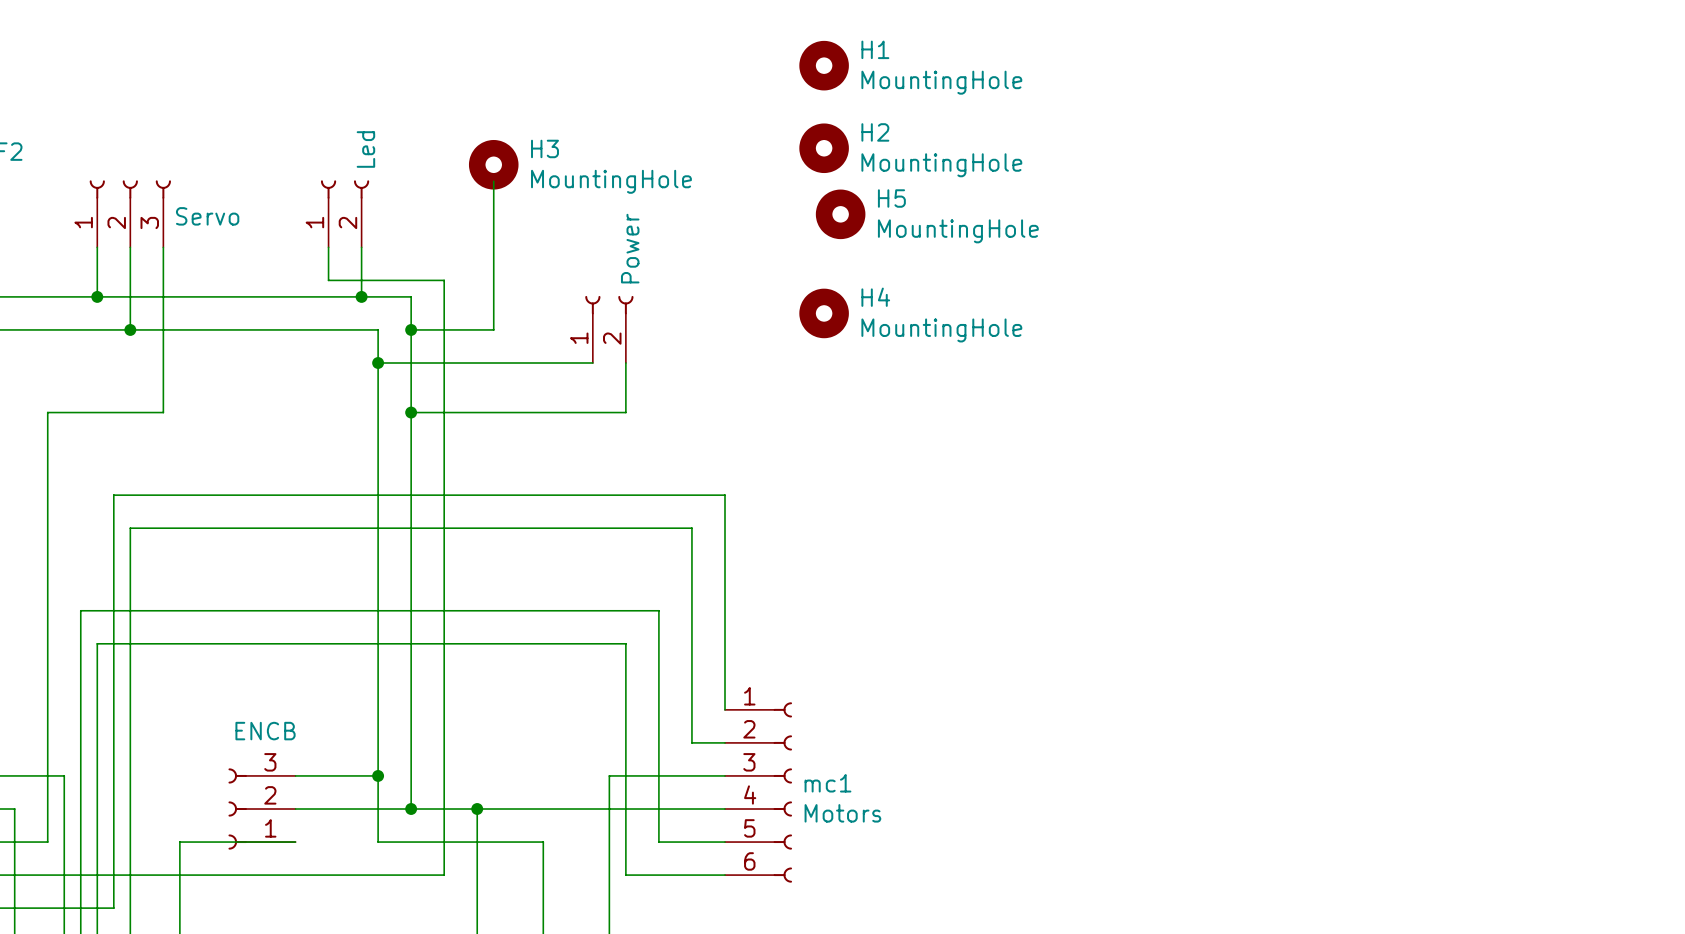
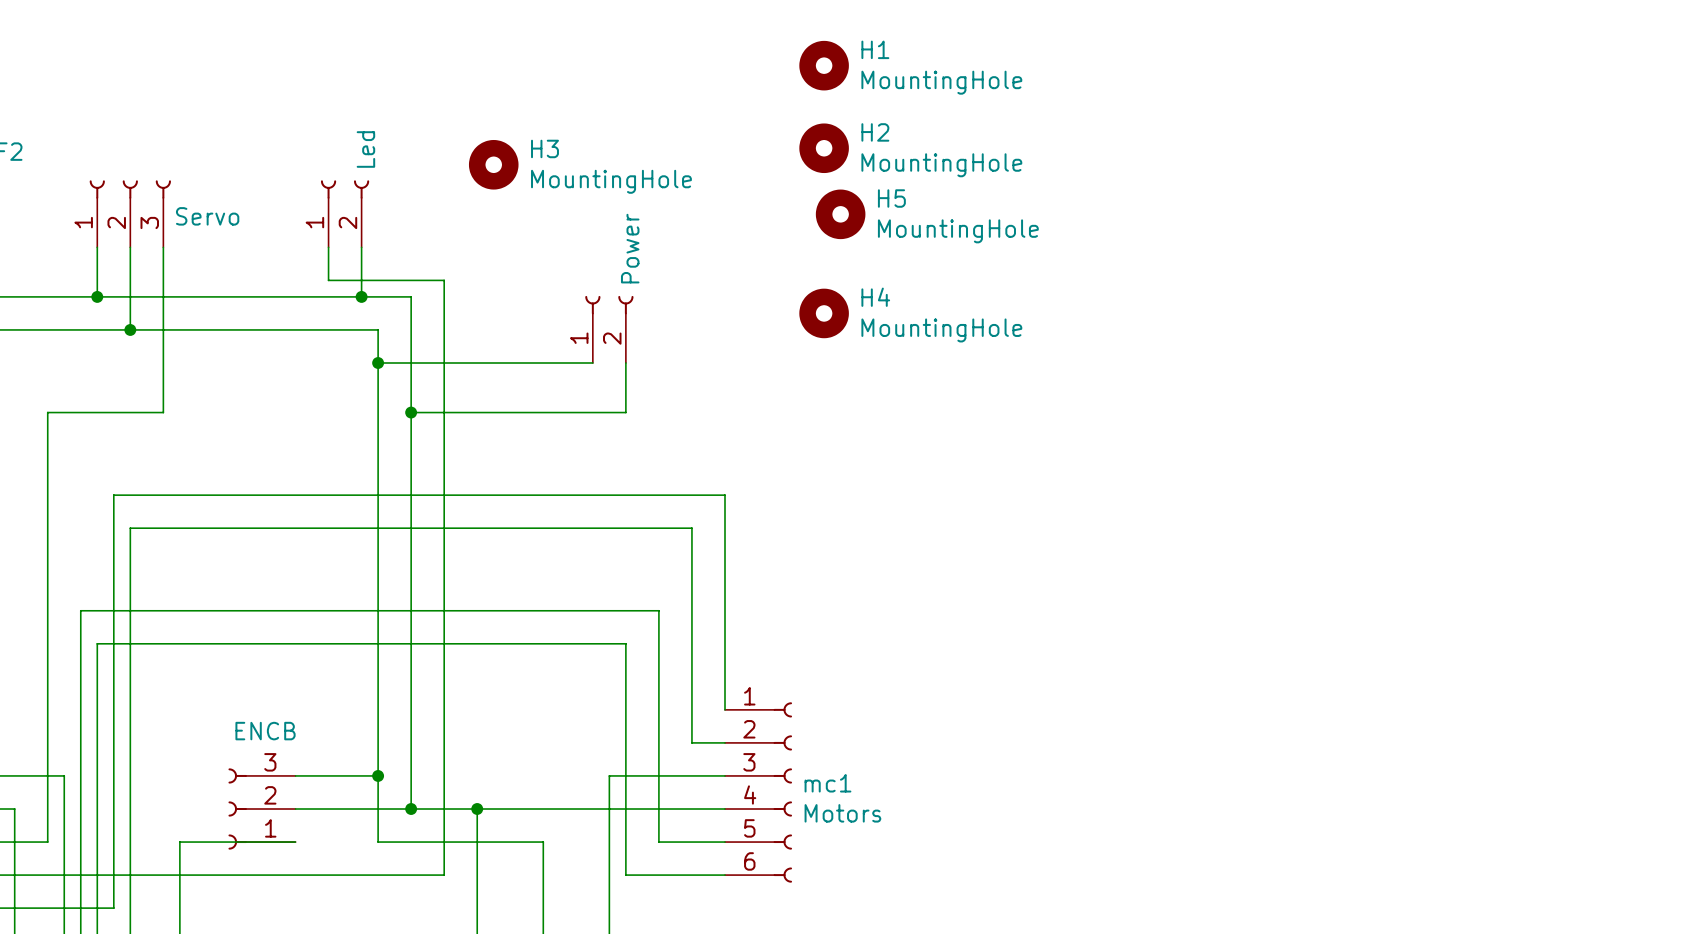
wire: (493, 181) (493, 329) (411, 329) -> none
junction: (411, 329) -> none

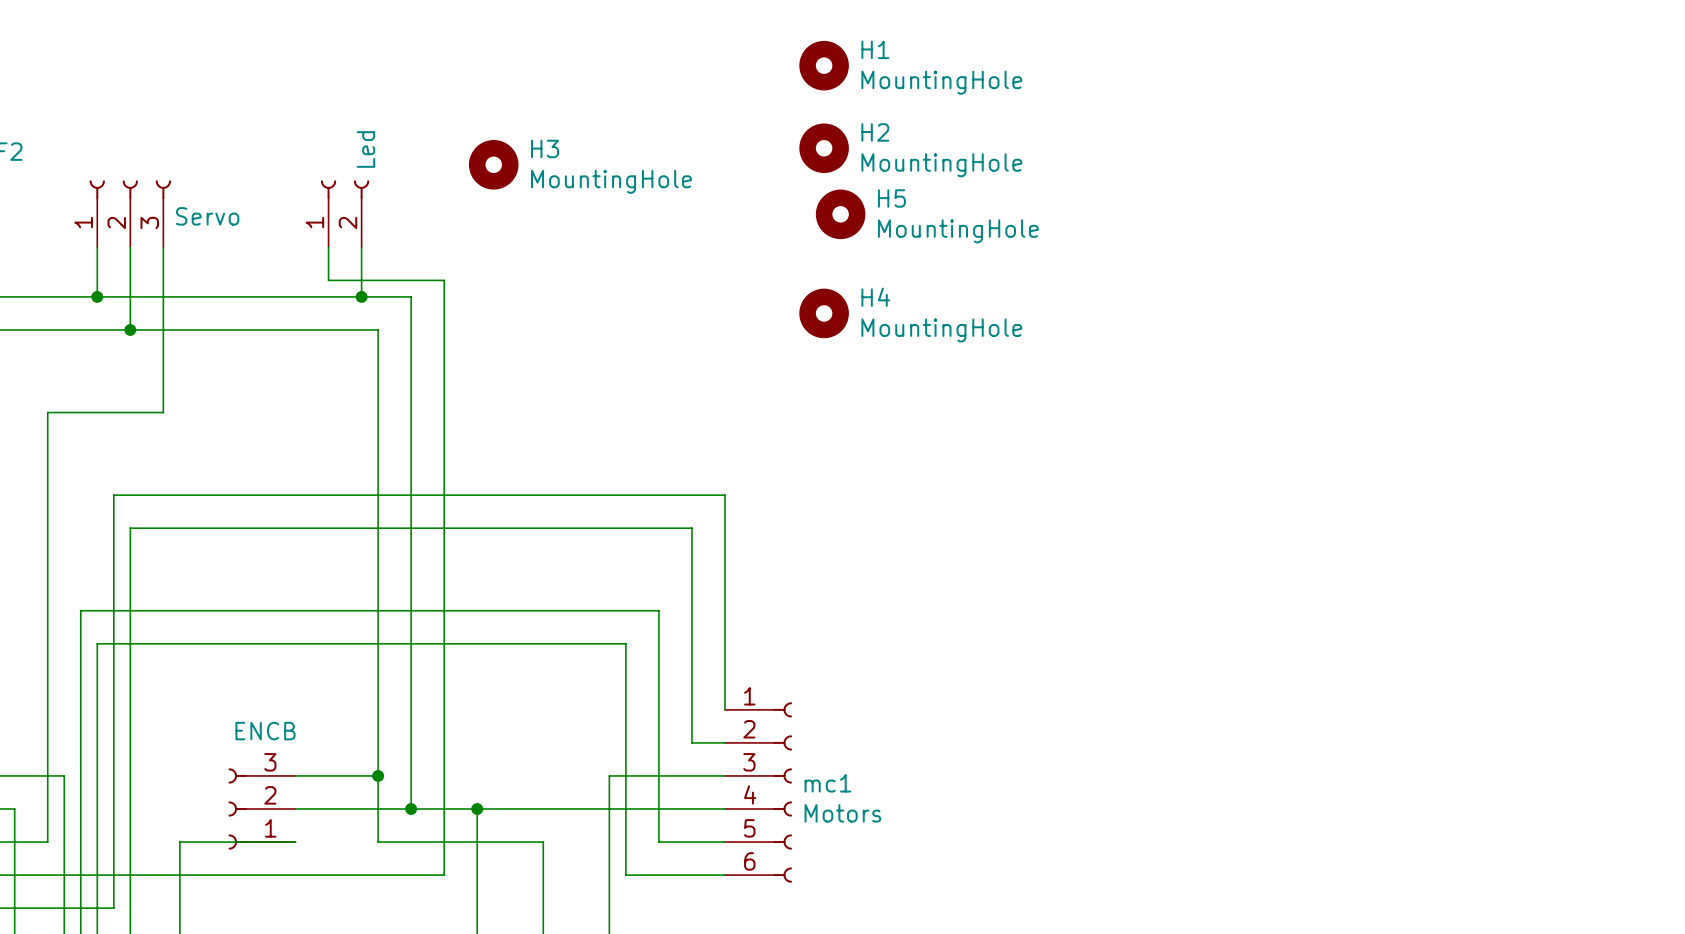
part: Power (609, 329) -> none
wire: (378, 363) (592, 363) -> none
junction: (378, 363) -> none
wire: (625, 363) (625, 412) (411, 412) -> none
junction: (411, 412) -> none

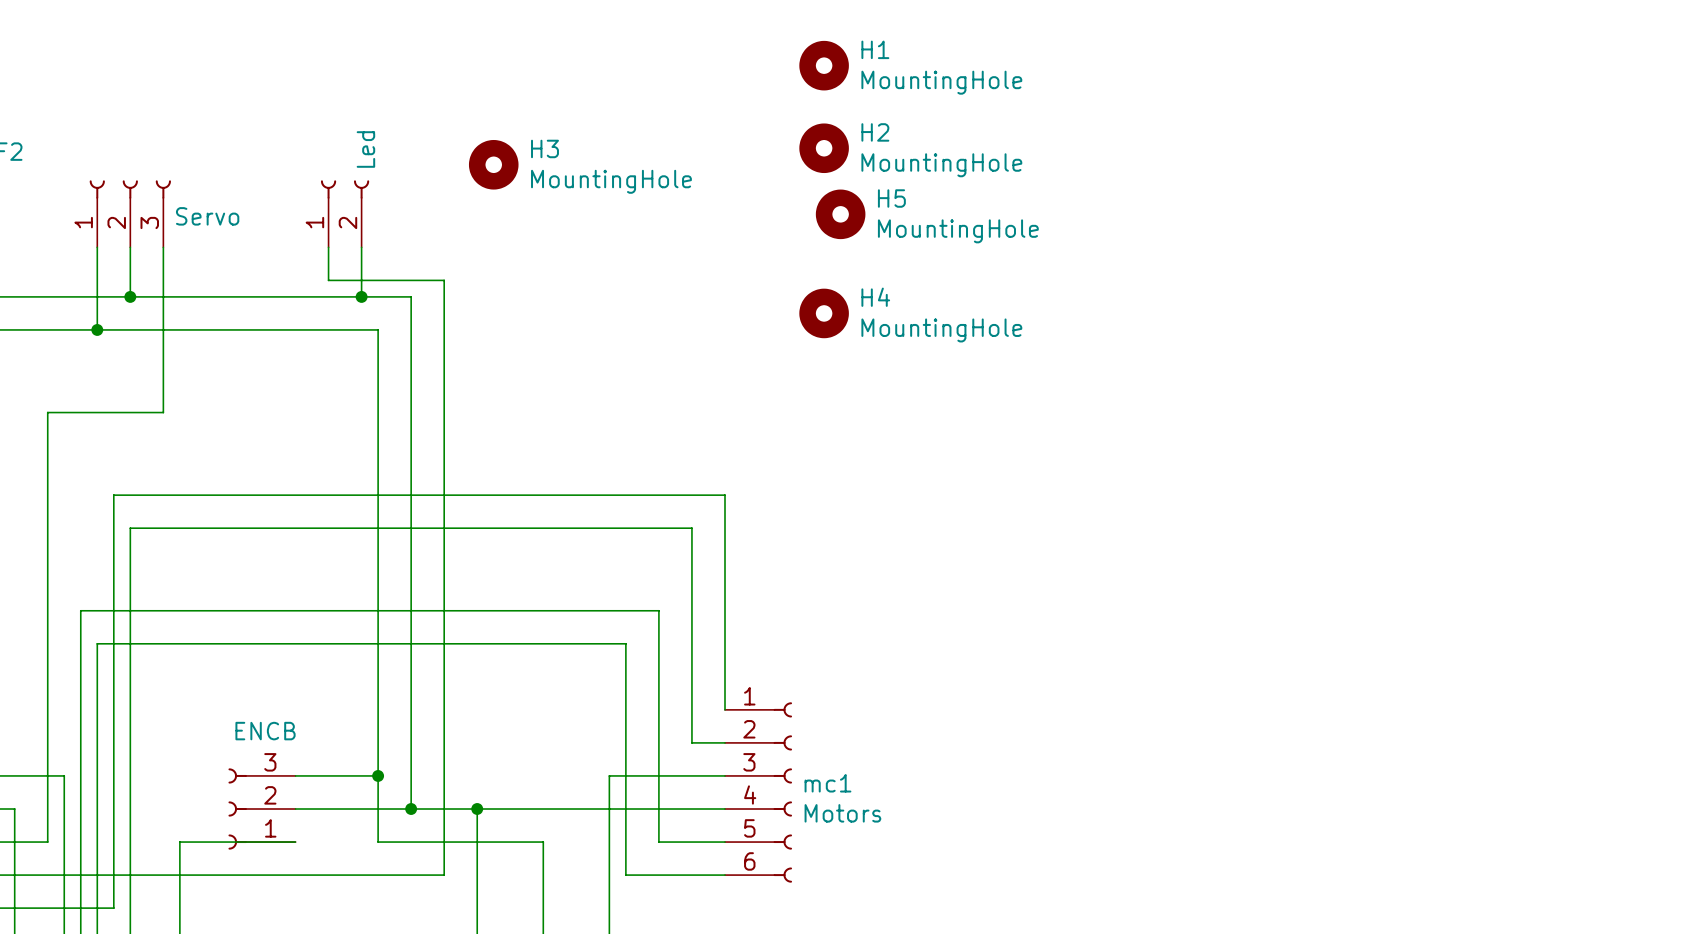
junction: (97, 296) -> none
wire: (130, 296) (130, 329) -> (97, 296) (97, 329)
junction: none -> (130, 296)
junction: none -> (97, 329)
junction: (130, 329) -> none

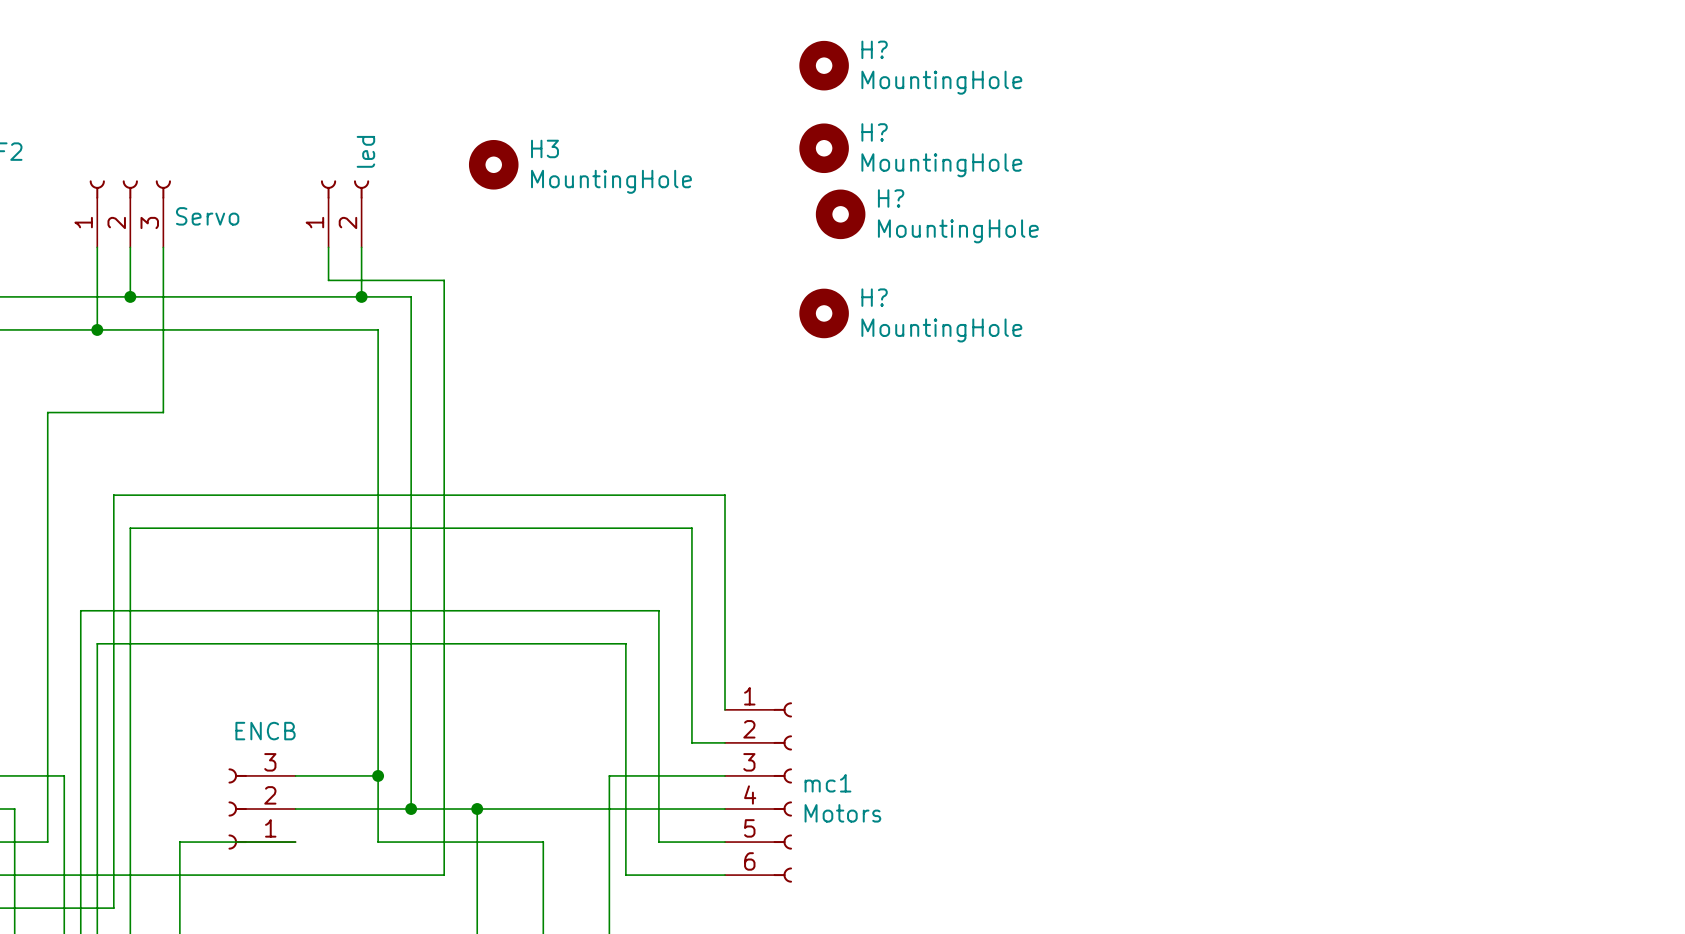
H1 name: H1 (875, 49) -> H? (874, 49)
H2 name: H2 (875, 132) -> H? (874, 132)
part value: Led (365, 149) -> led (365, 151)
H5 name: H5 (891, 198) -> H? (891, 198)
H4 name: H4 (875, 297) -> H? (874, 297)

